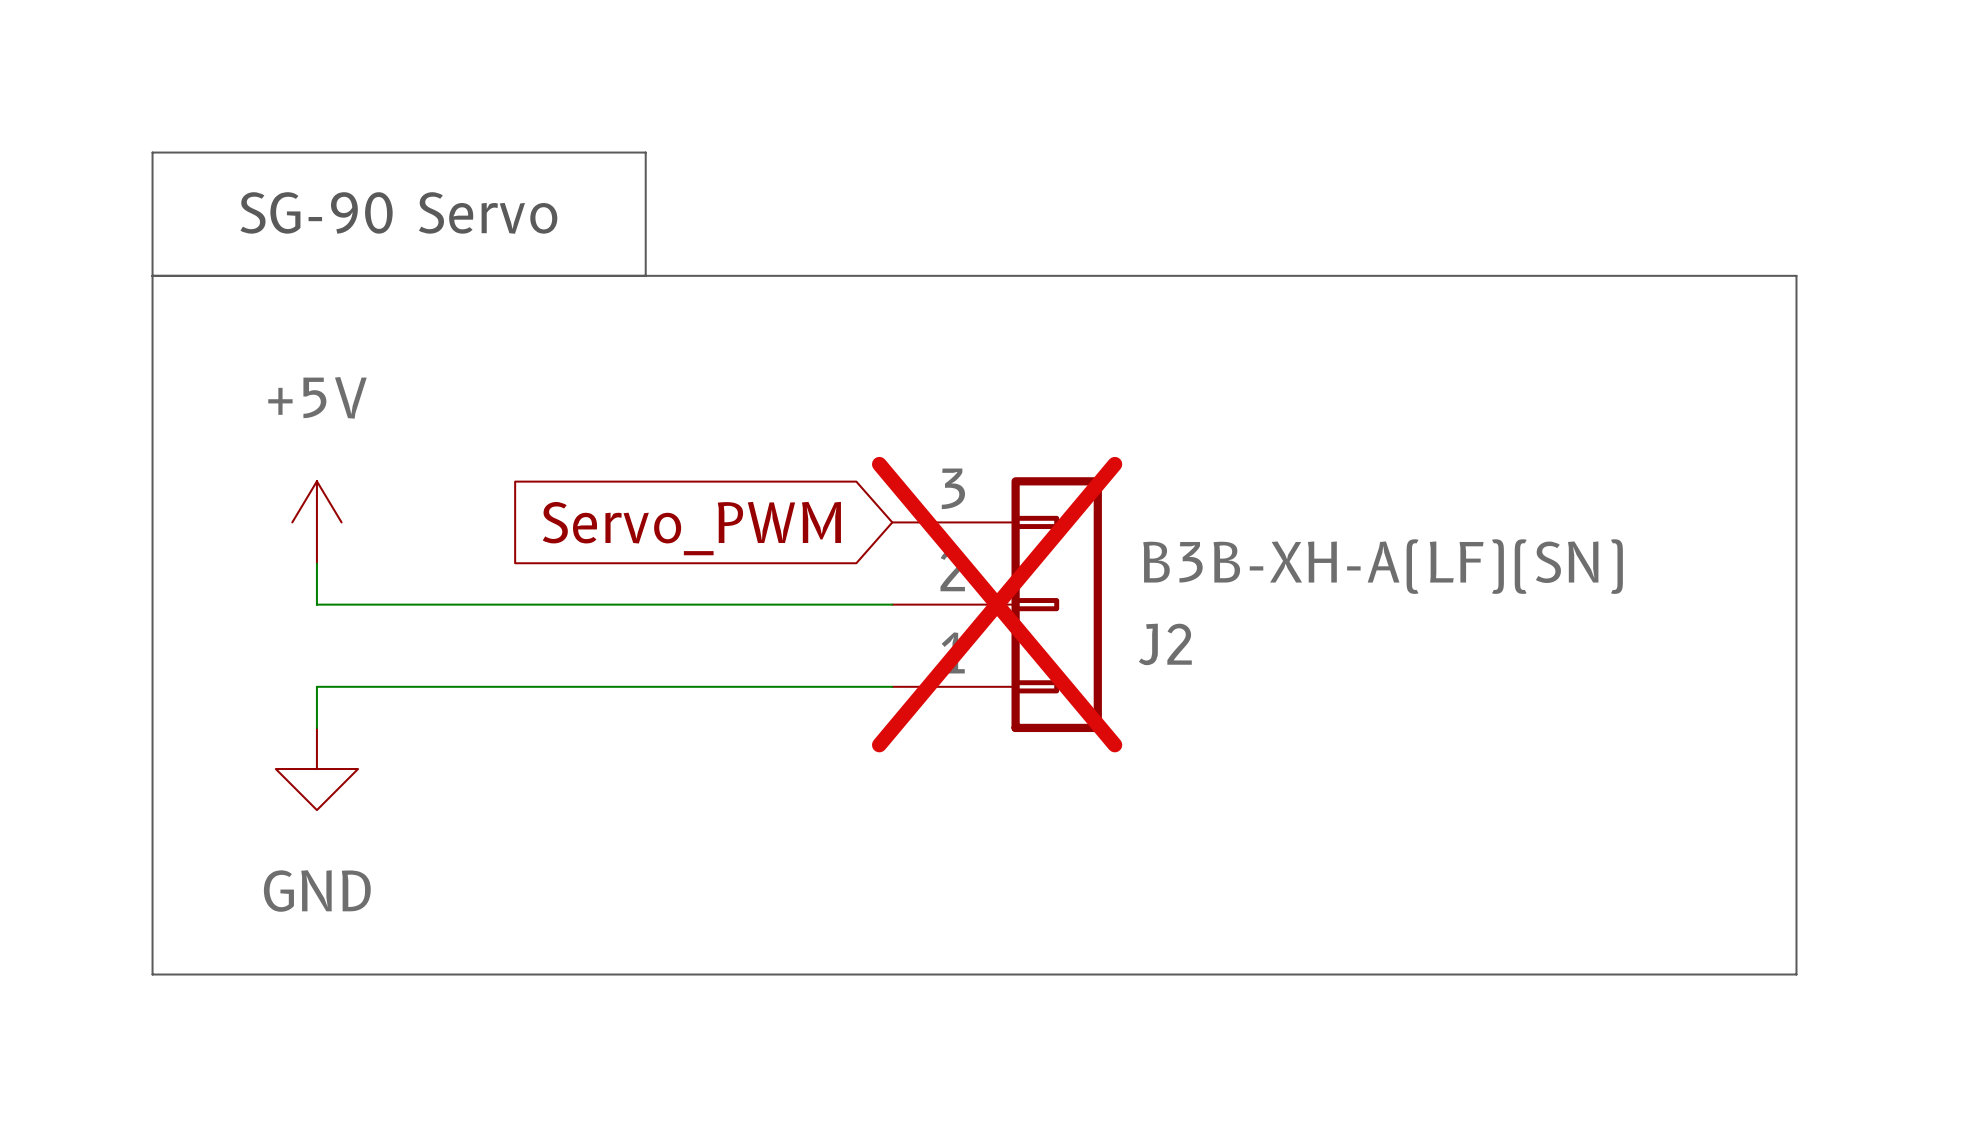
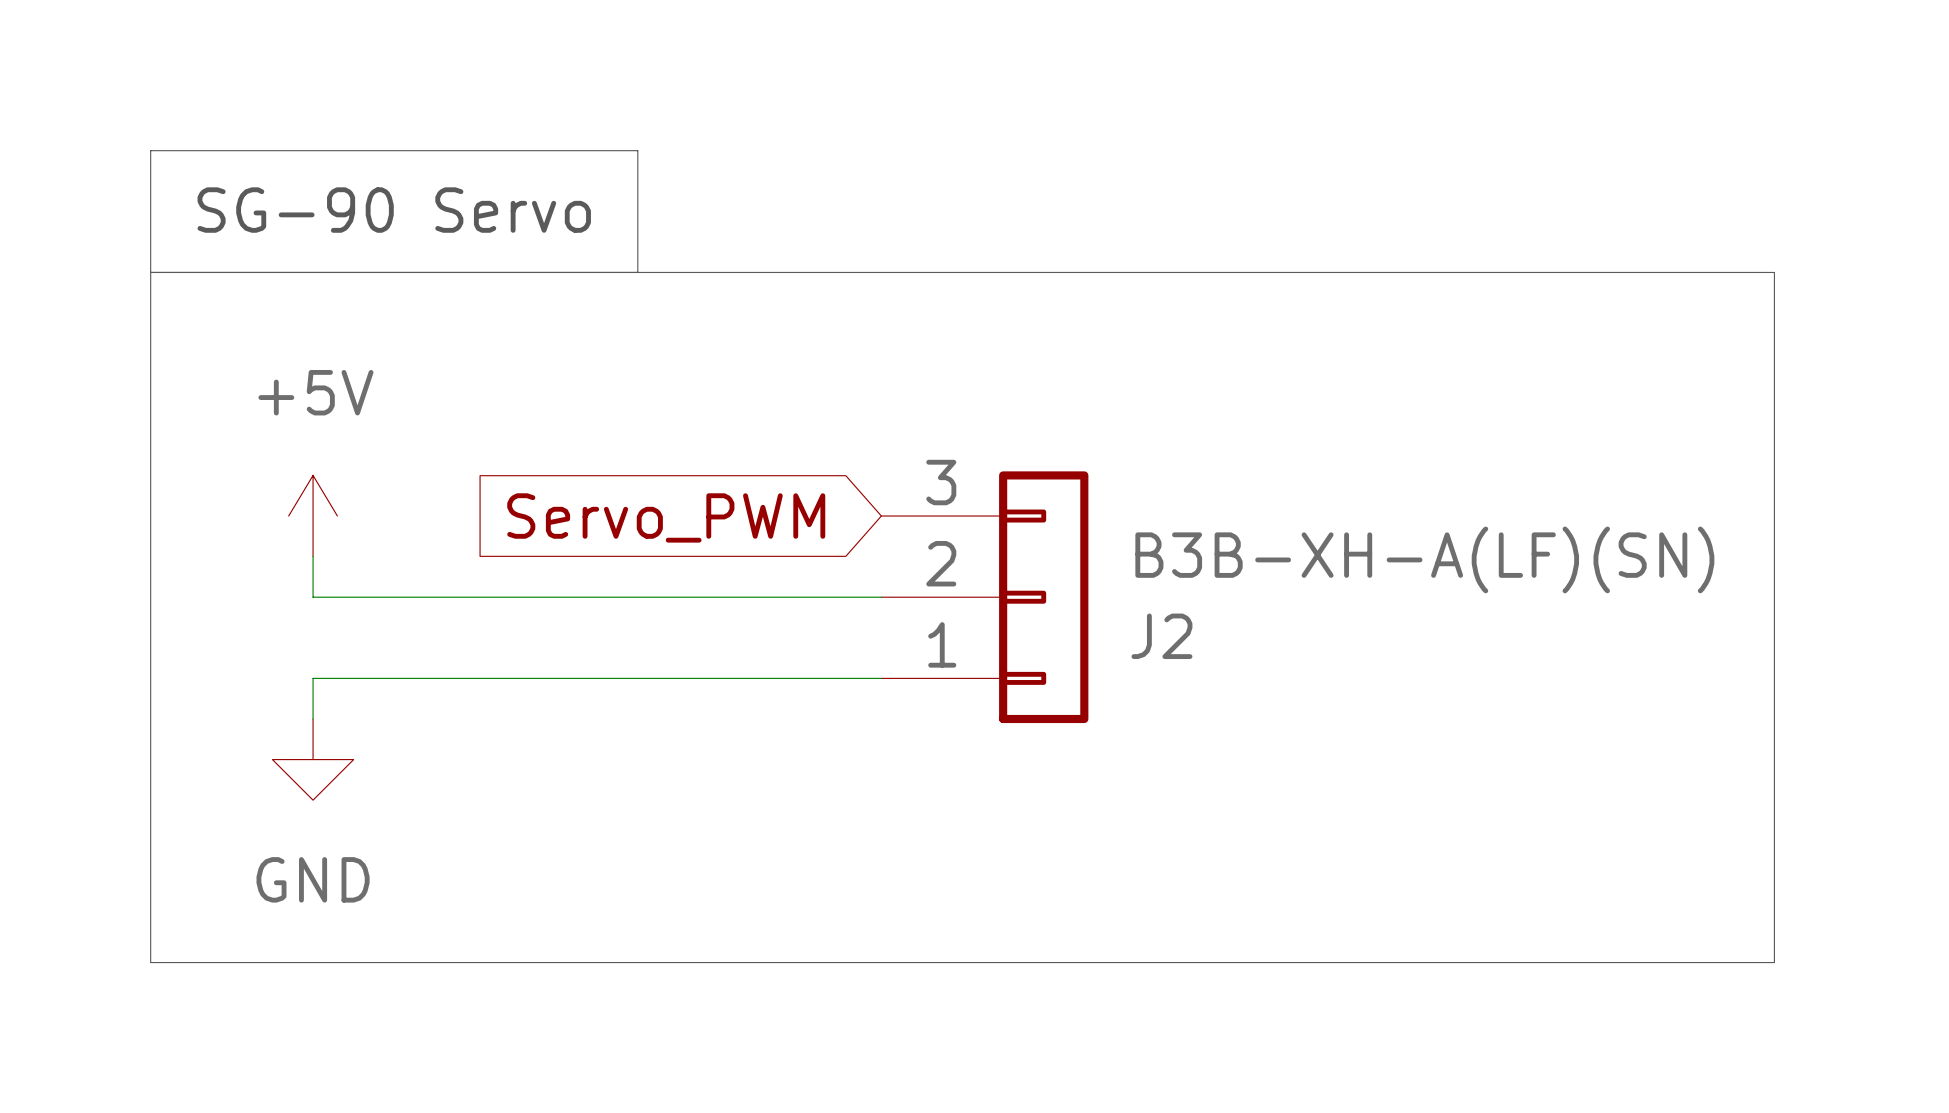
J2 do-not-place cross: (997, 604) -> none

